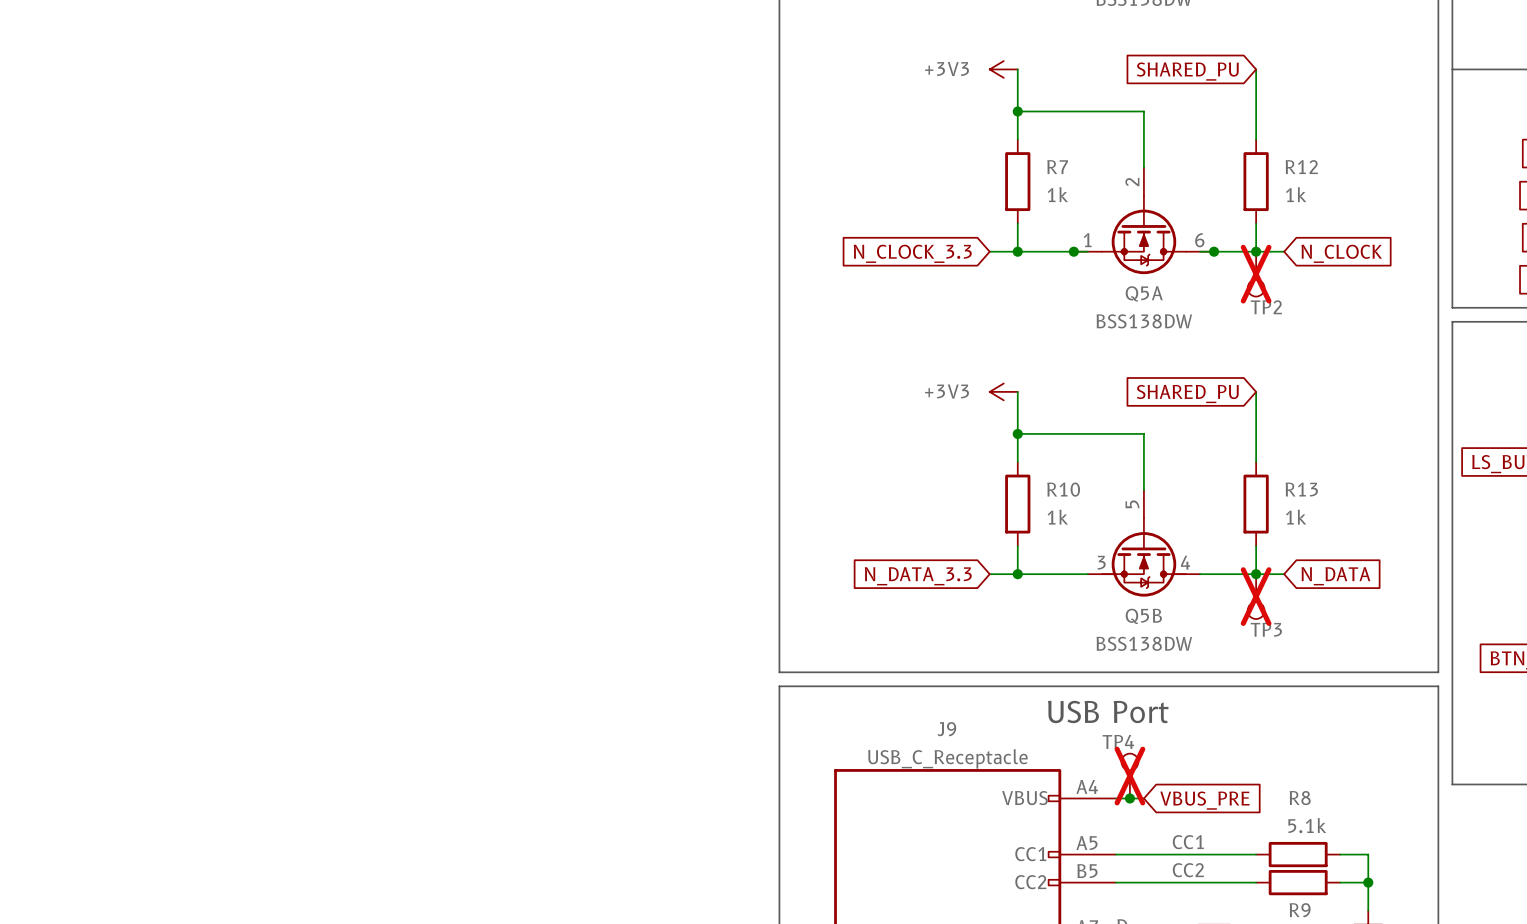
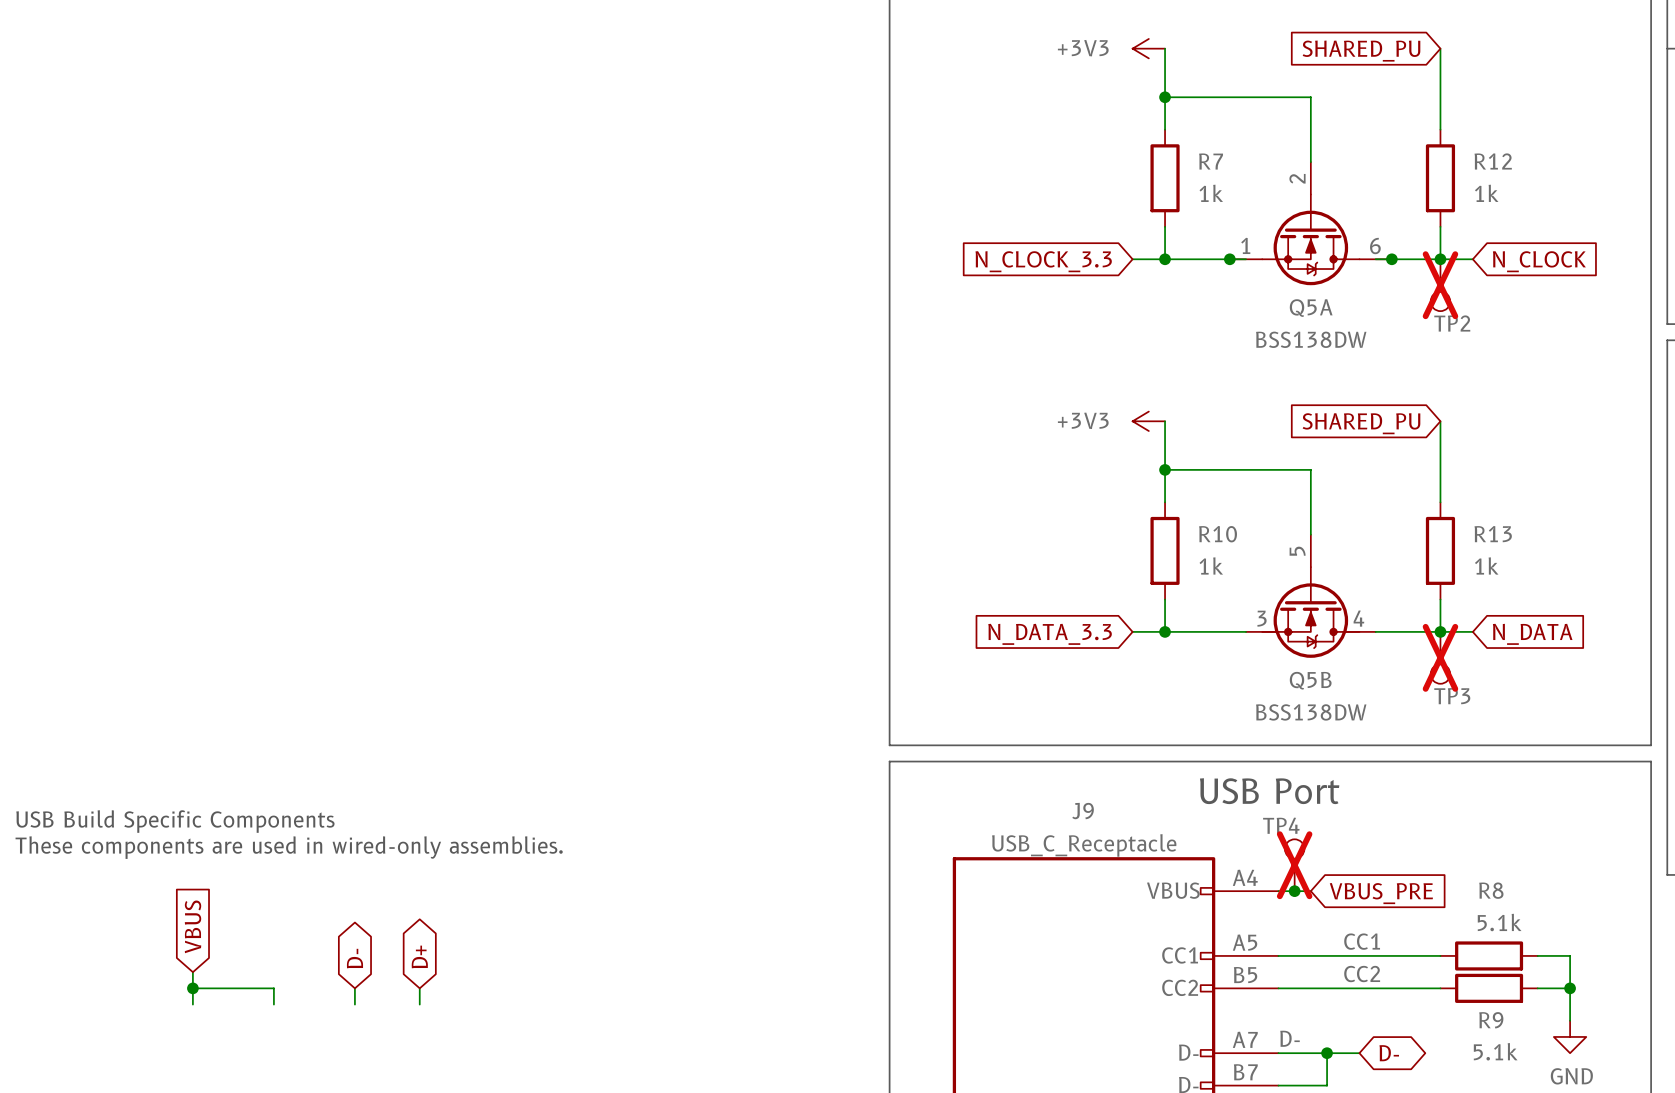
text: none -> USB Build Specific Components (175, 821)
text: none -> These components are used in wired-only assemblies. (289, 847)
global label: none -> VBUS (193, 926)
global label: none -> D+ (419, 956)
global label: none -> D- (354, 958)
wire: none -> (192, 972) (192, 1004)
wire: none -> (192, 988) (273, 988) (273, 1004)
junction: none -> (192, 988)
wire: none -> (354, 988) (354, 1004)
wire: none -> (419, 988) (419, 1004)

